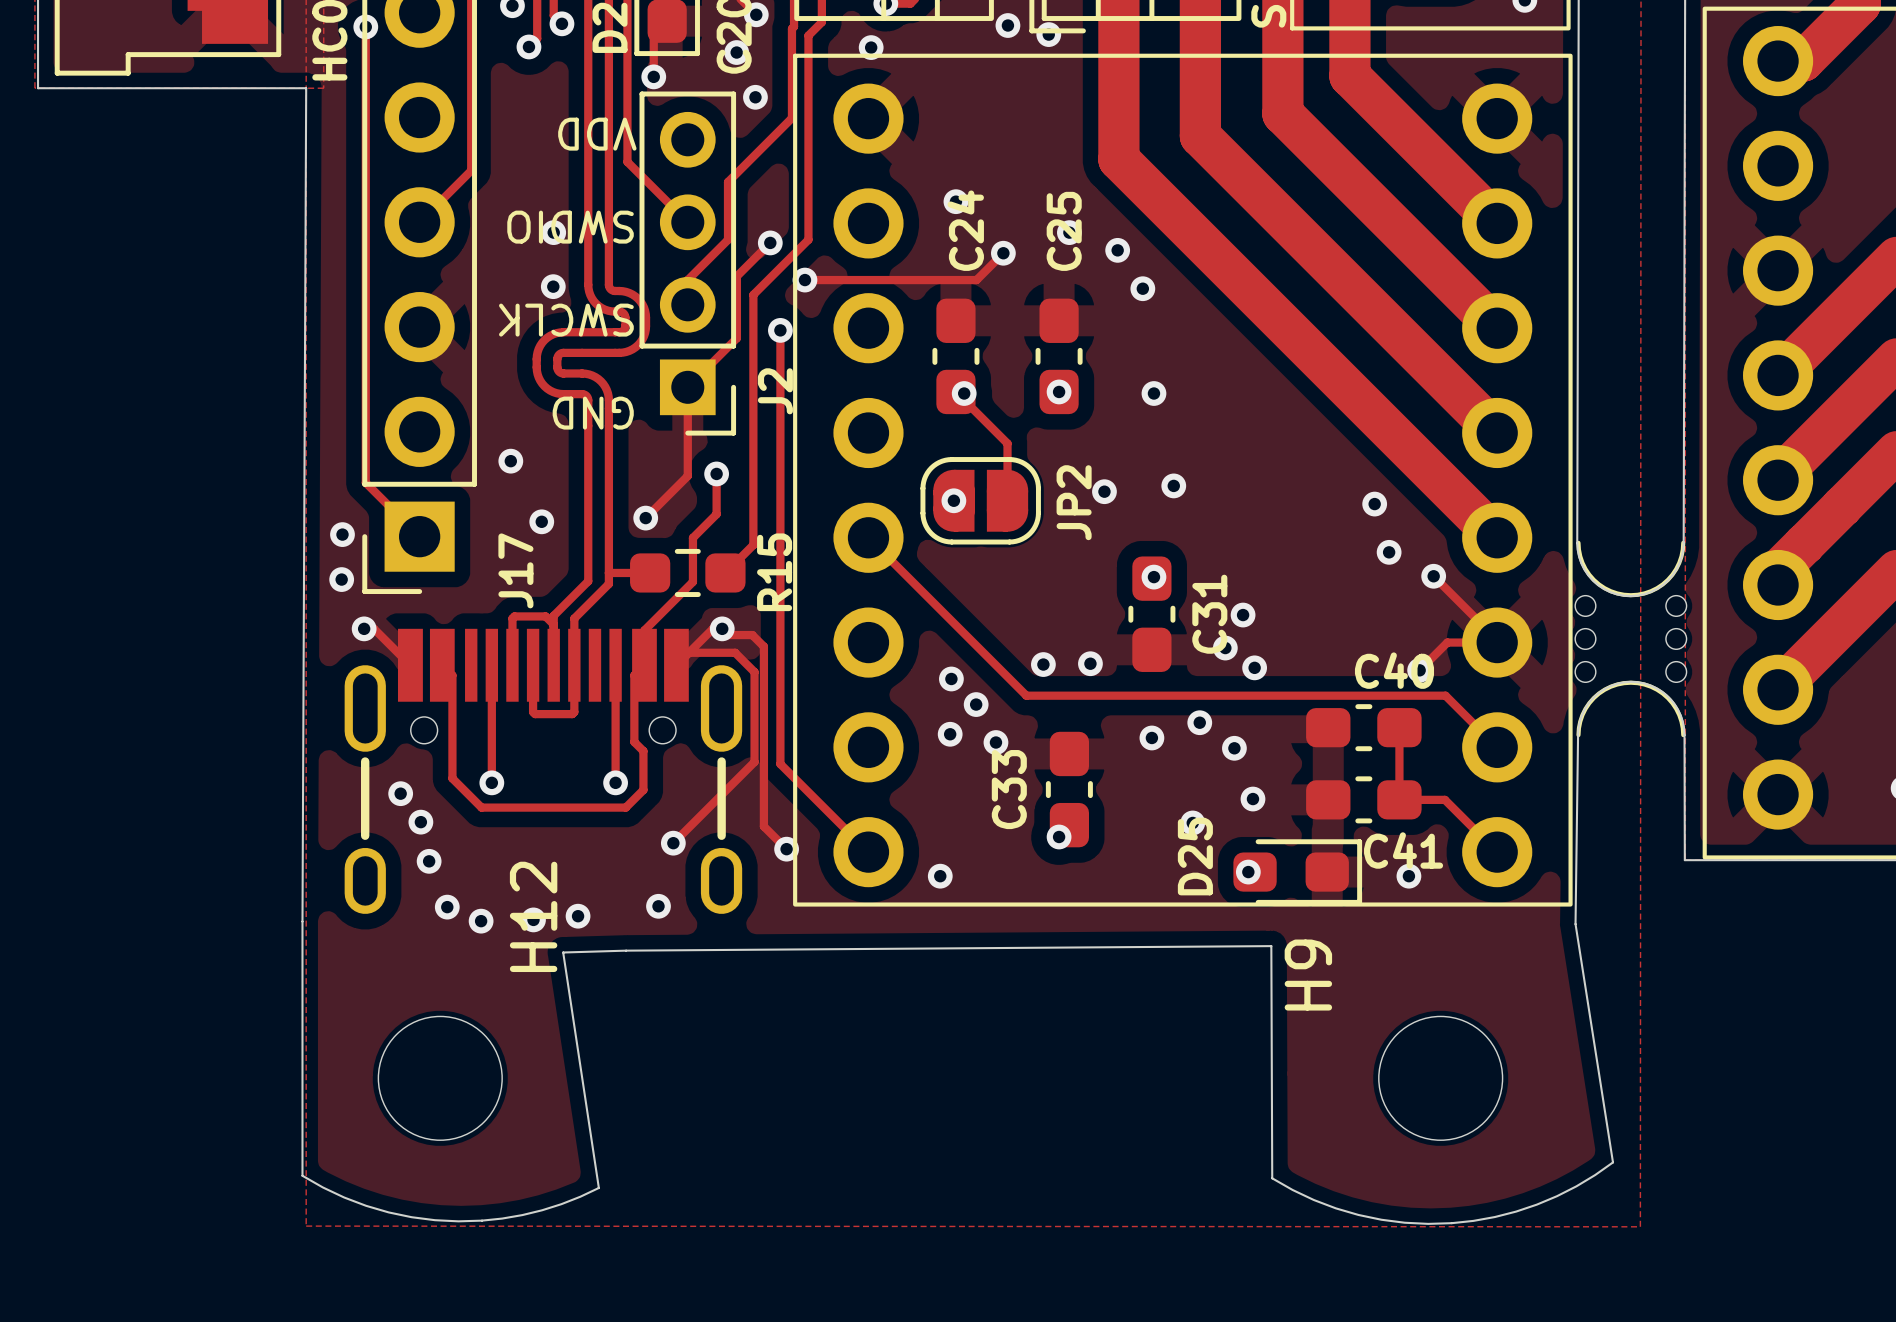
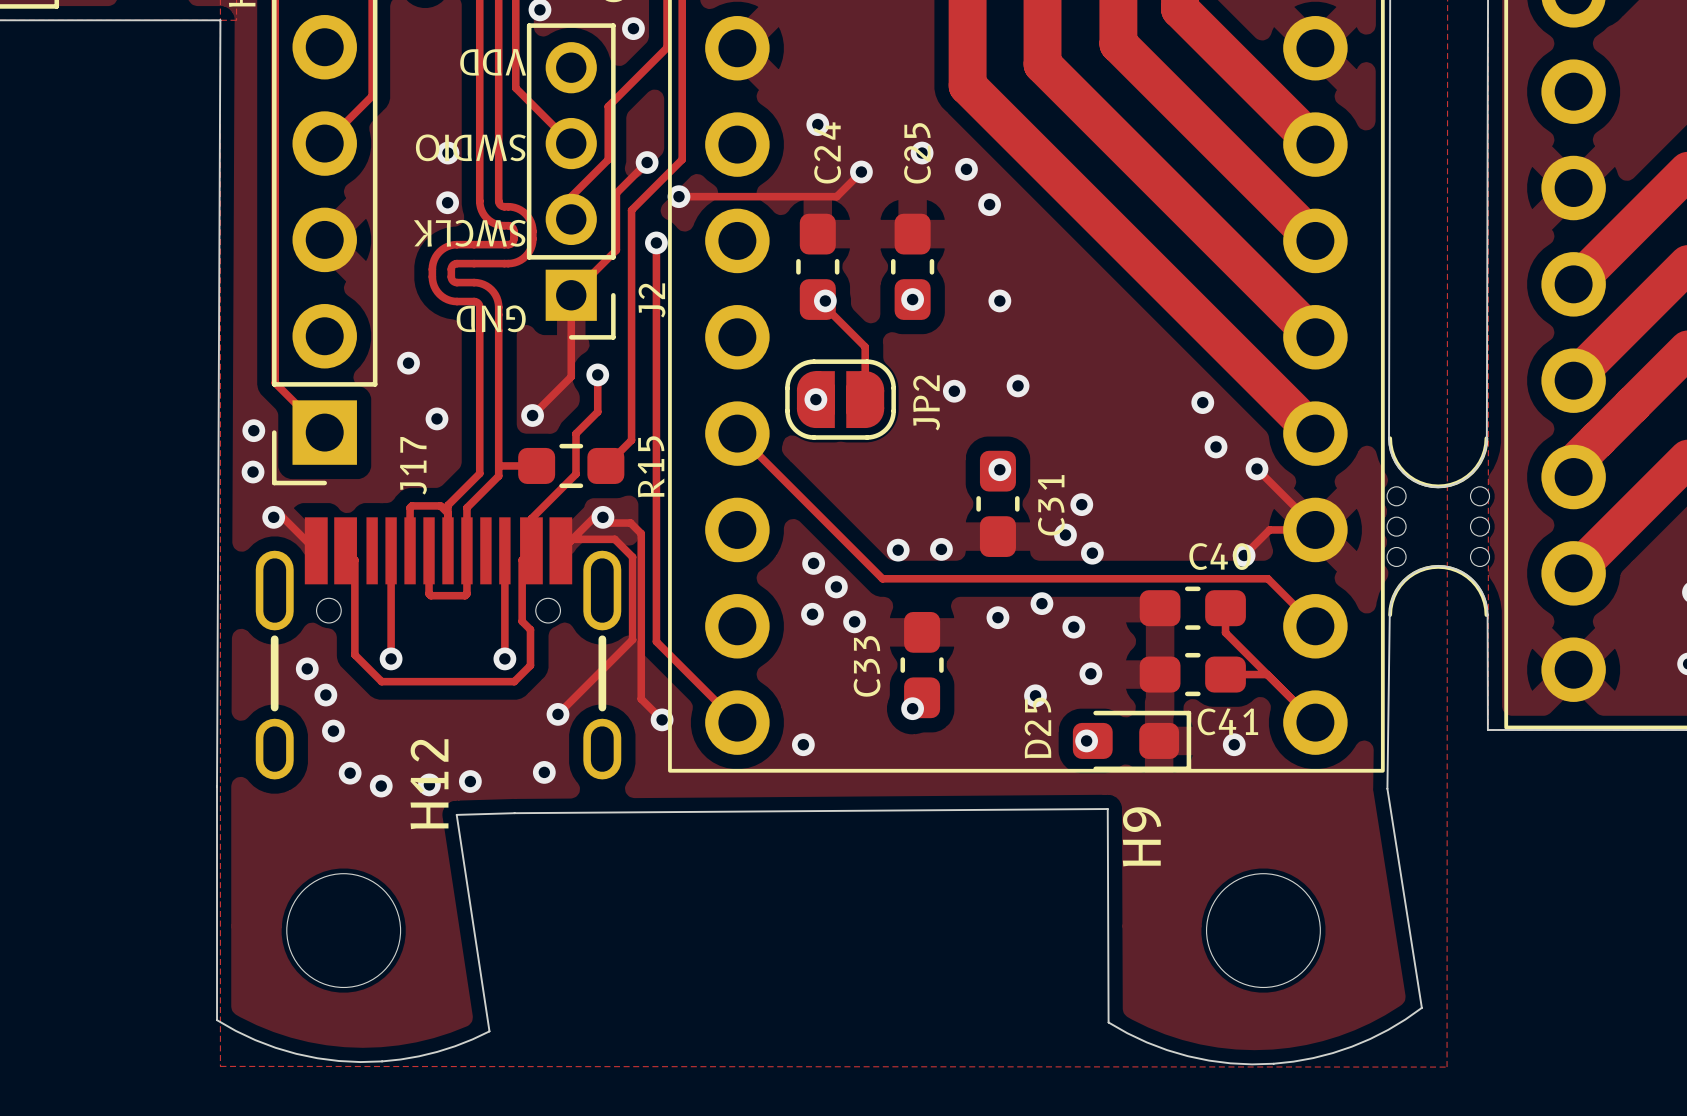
track: (1399, 754) (1399, 799) -> (1225, 632) (1267, 674)

